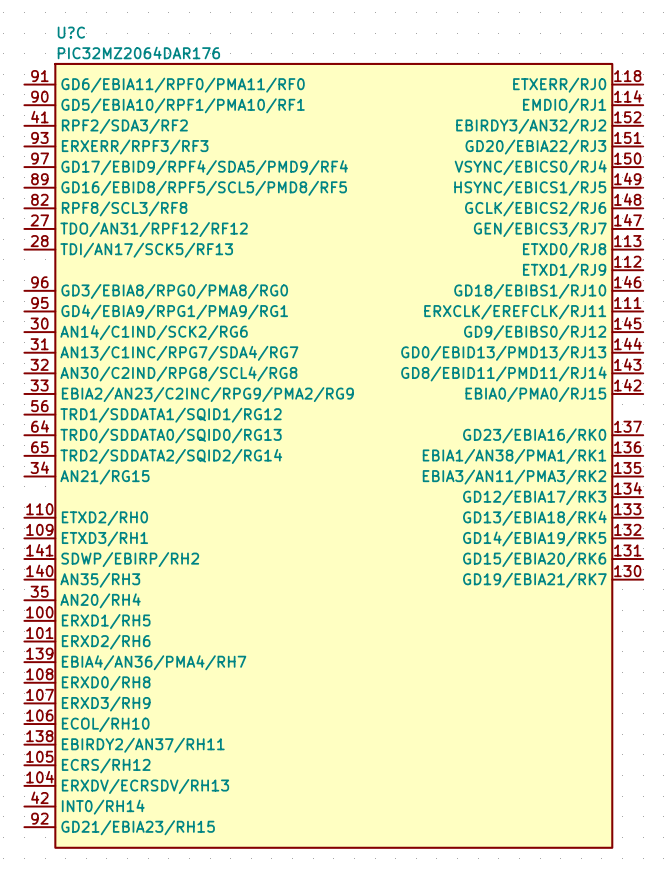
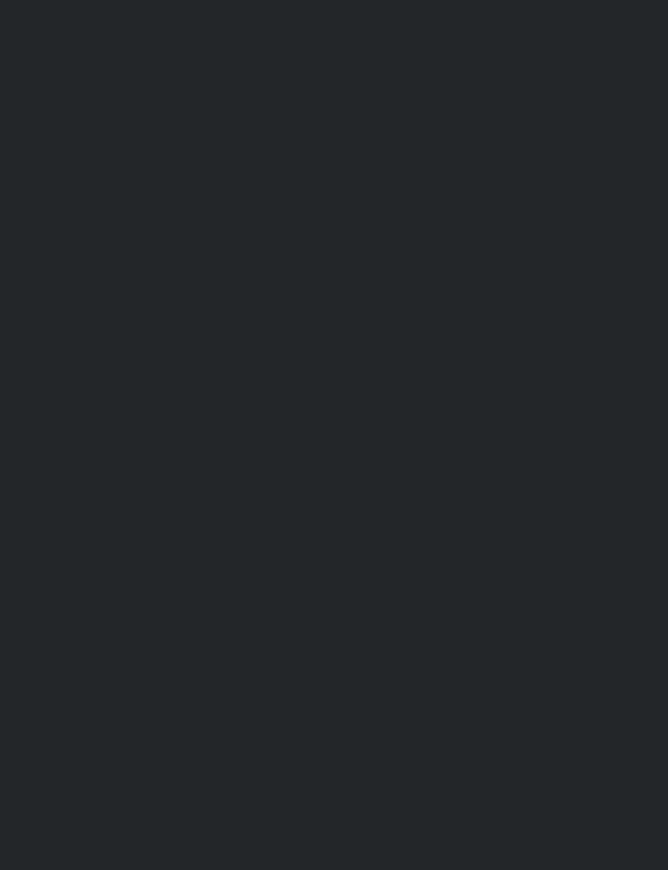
U?C: PIC32MZ2064DAR176 (333, 455) -> none

